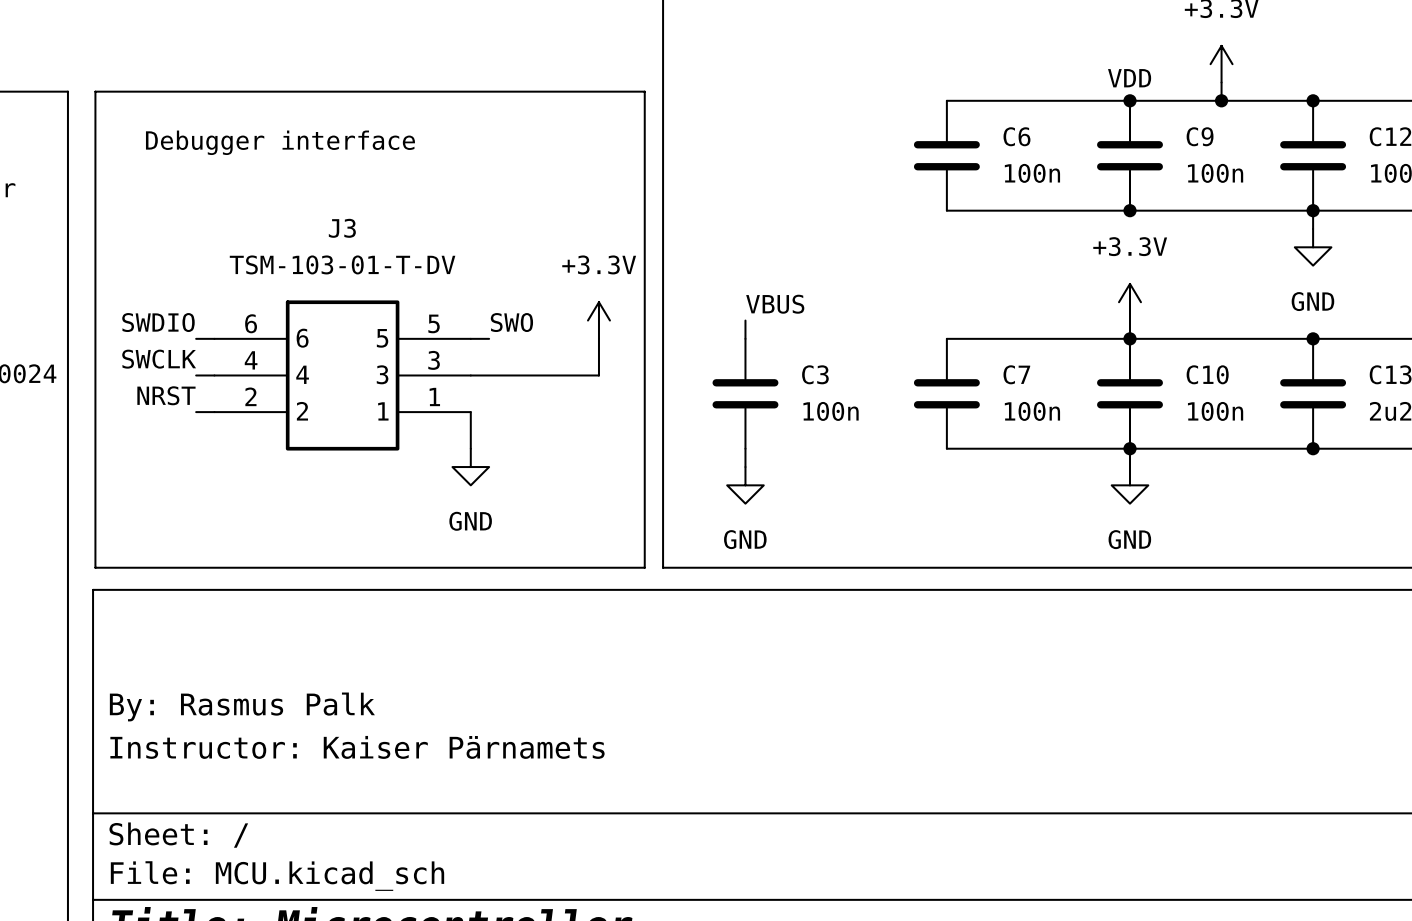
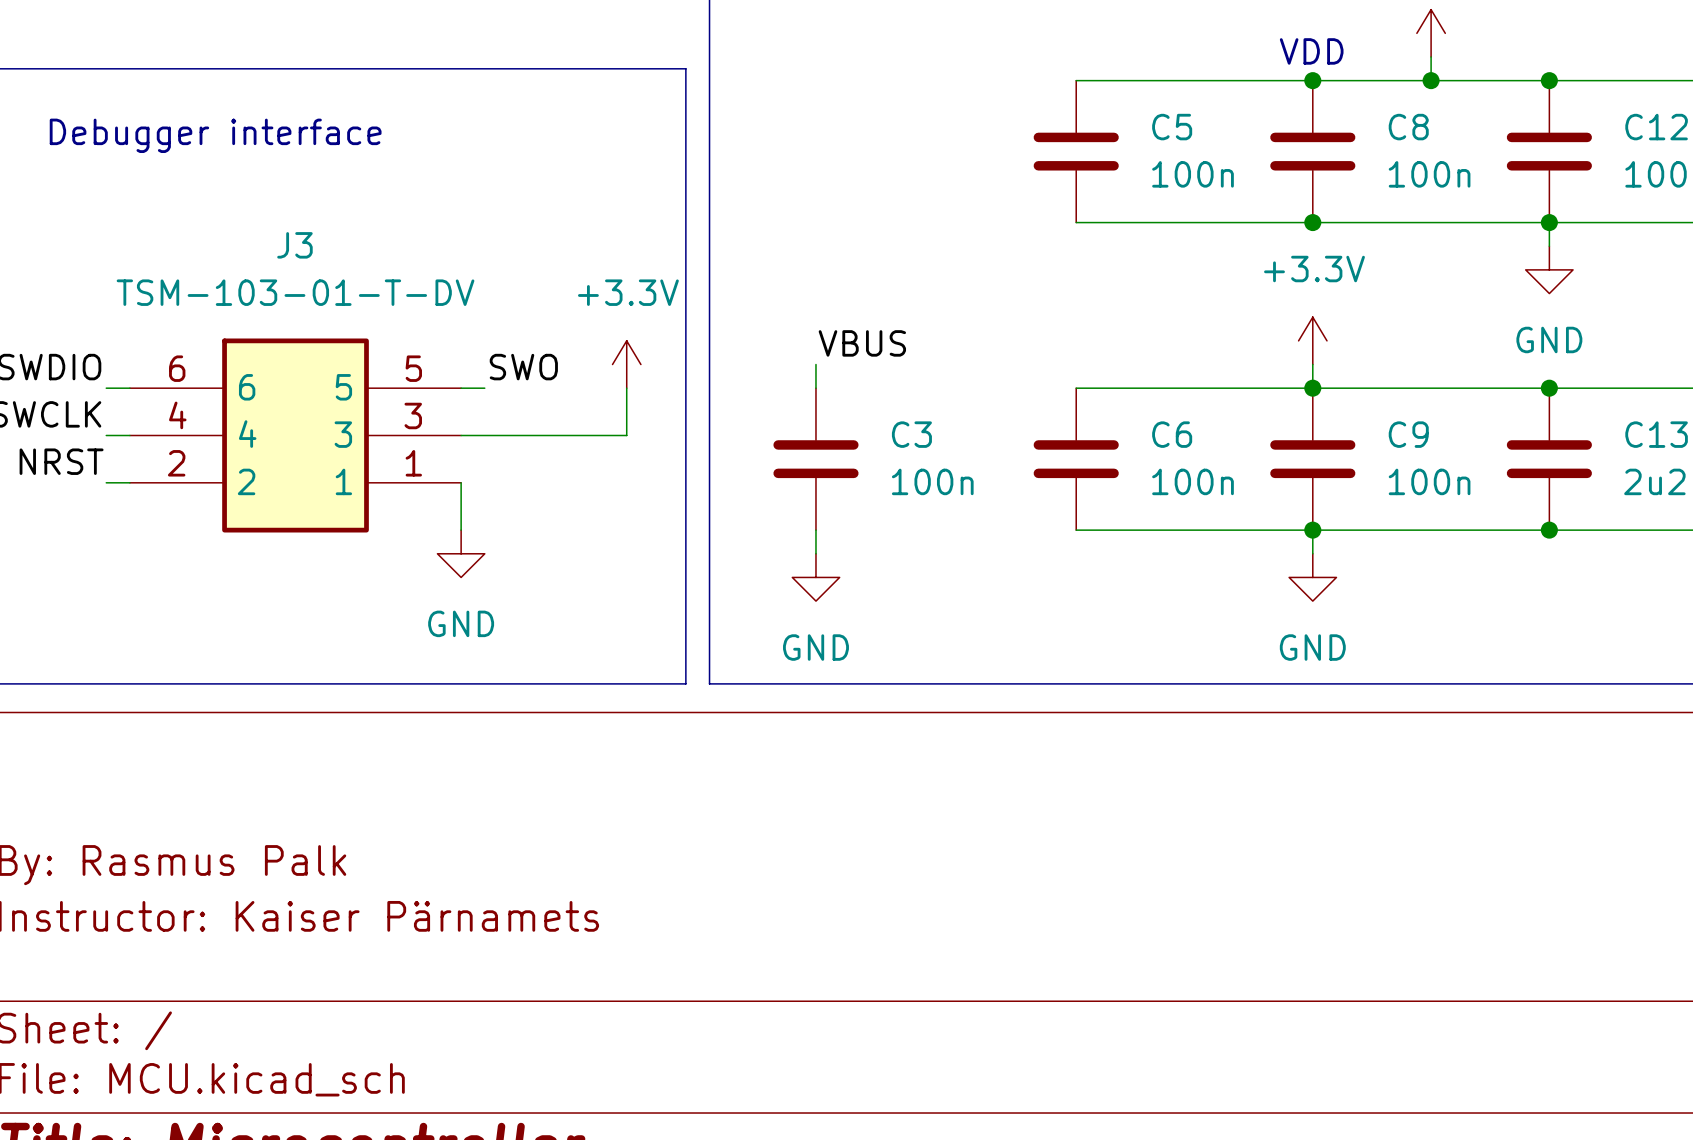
C6 name: C6 (1016, 136) -> C5 (1172, 127)
C9 name: C9 (1200, 136) -> C8 (1408, 127)
C7 name: C7 (1016, 374) -> C6 (1172, 434)
C10 name: C10 (1207, 374) -> C9 (1408, 434)

